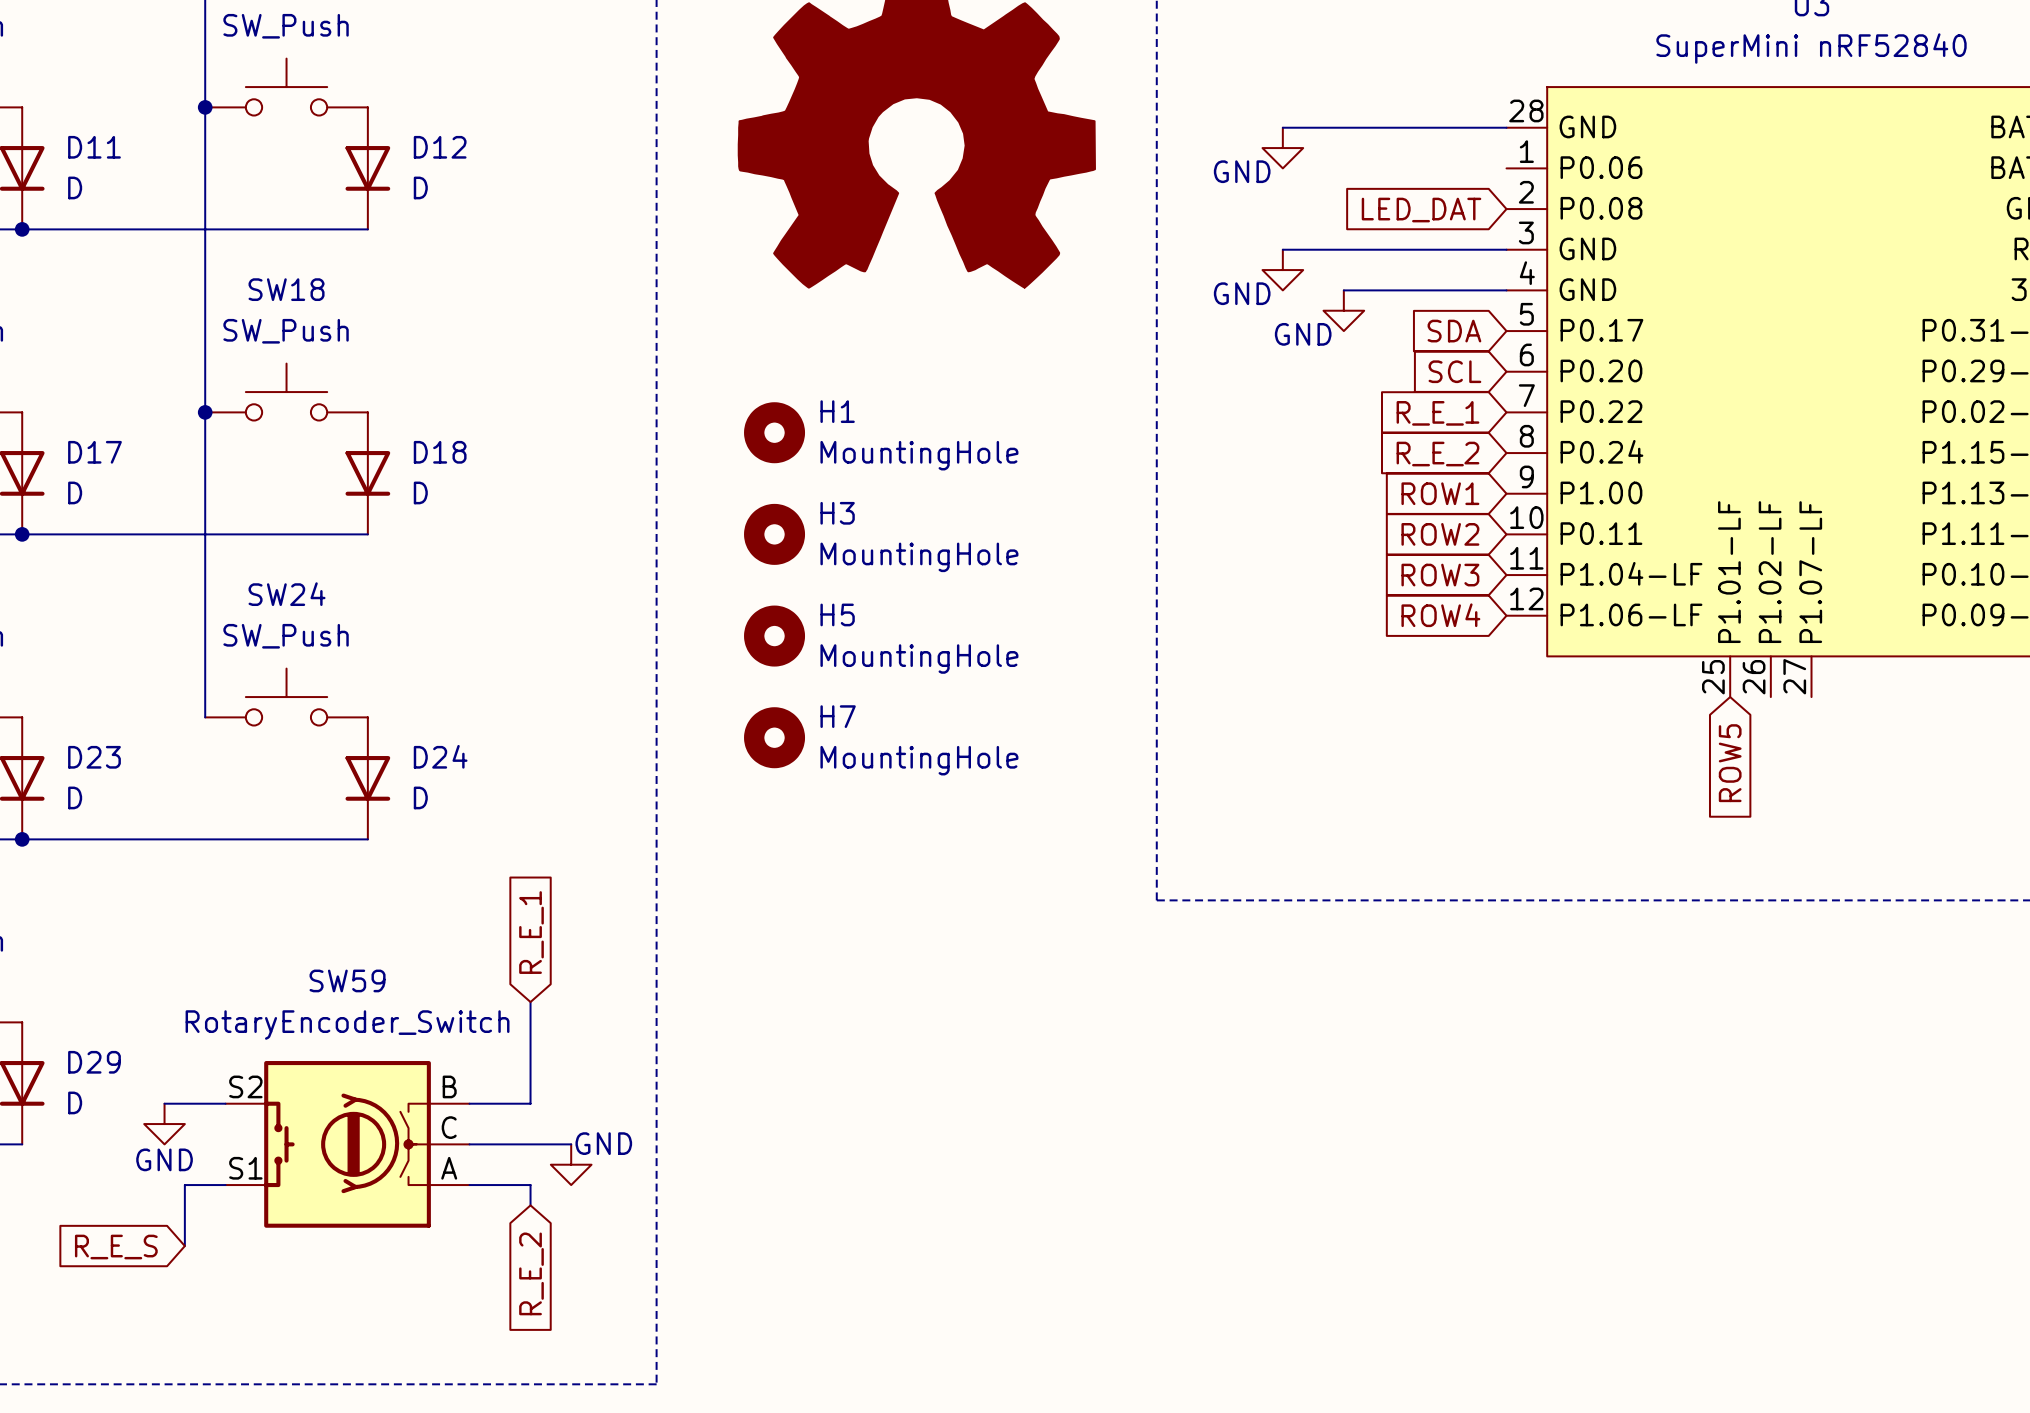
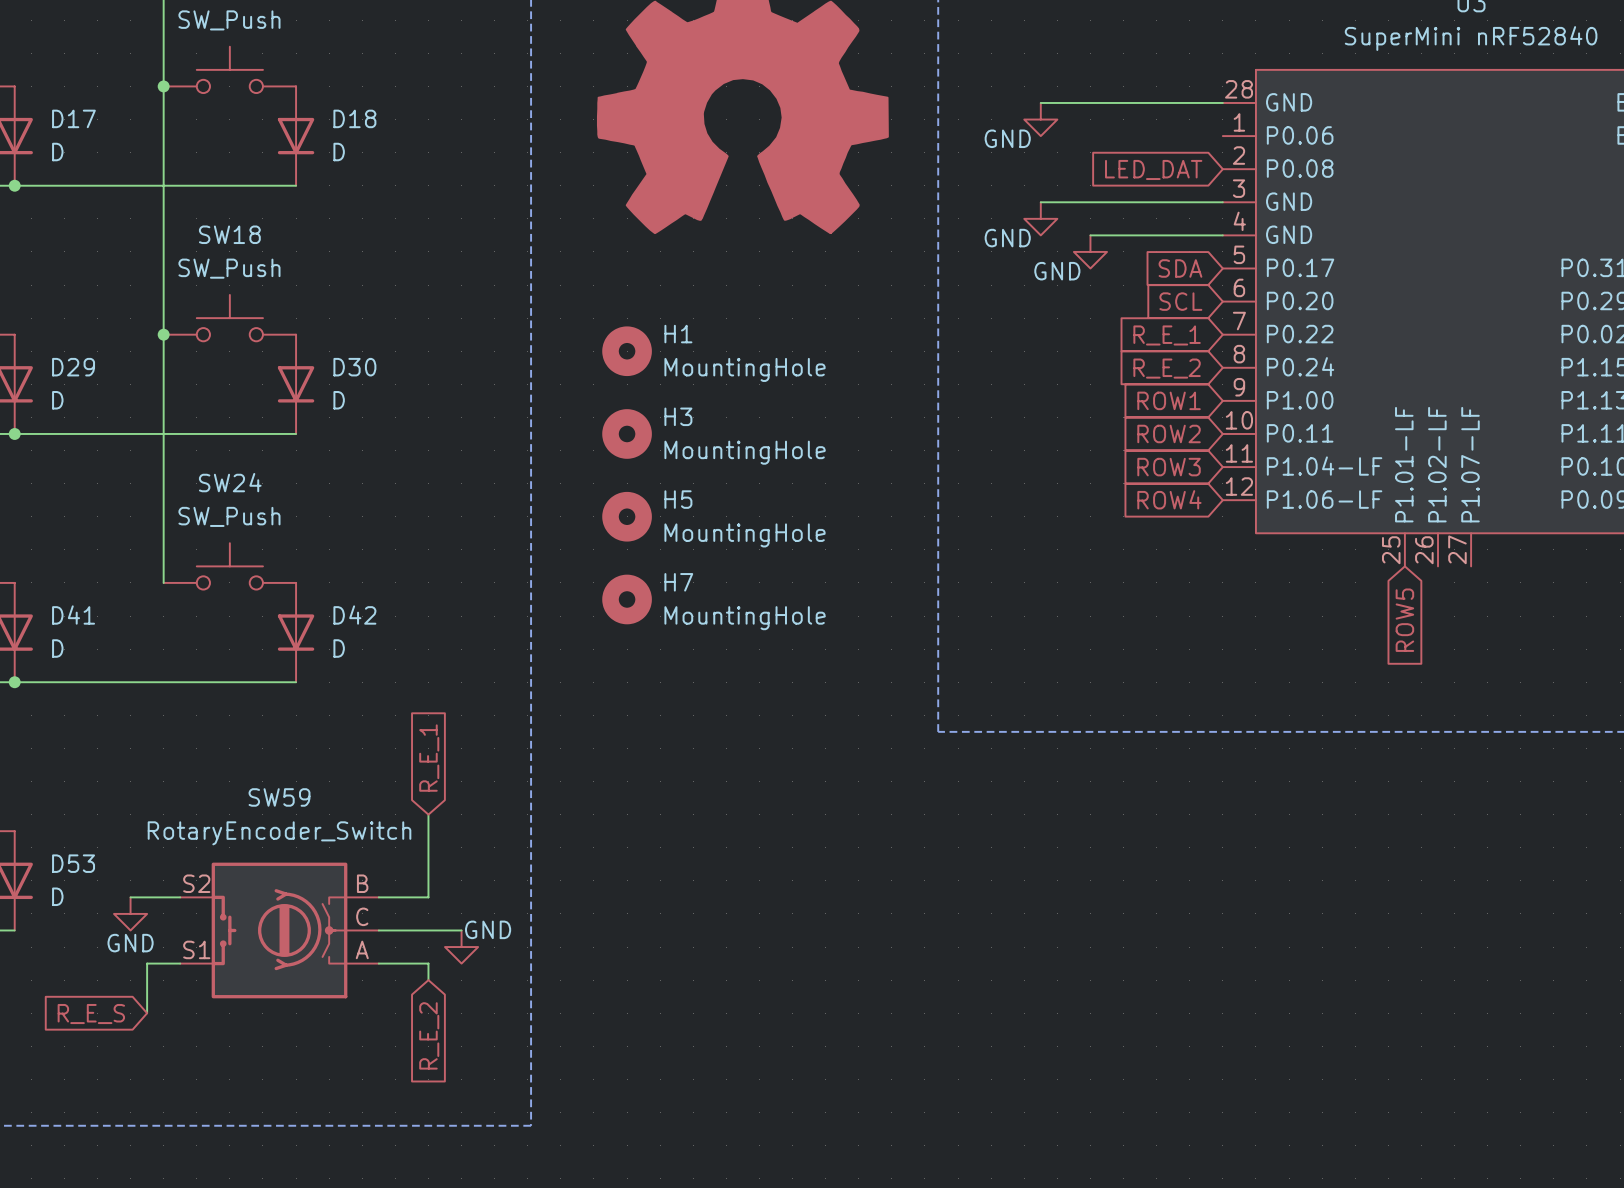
D11 name: D11 (94, 147) -> D17 (73, 118)
D12 name: D12 (440, 147) -> D18 (354, 118)
D17 name: D17 (94, 452) -> D29 (73, 367)
D18 name: D18 (440, 452) -> D30 (354, 367)
D24 name: D24 (440, 756) -> D42 (354, 615)
D23 name: D23 (94, 757) -> D41 (73, 615)
D29 name: D29 (94, 1062) -> D53 (73, 863)

